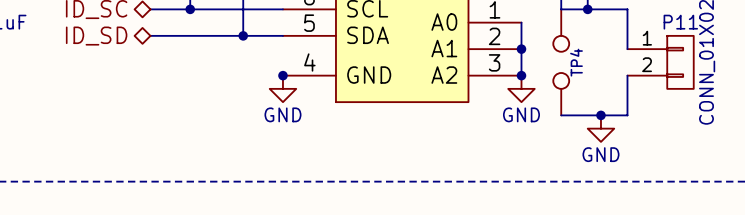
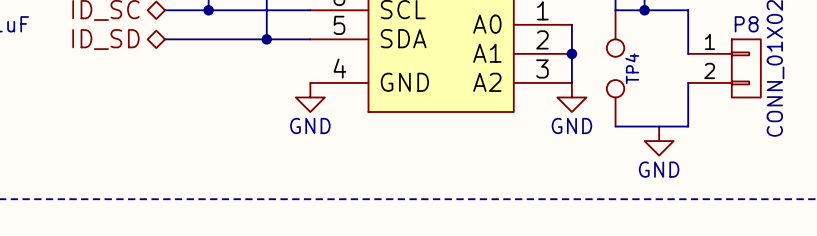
P11 name: P11 (680, 22) -> P8 (746, 24)
junction: (282, 75) -> none
junction: (521, 75) -> none
junction: (600, 115) -> none

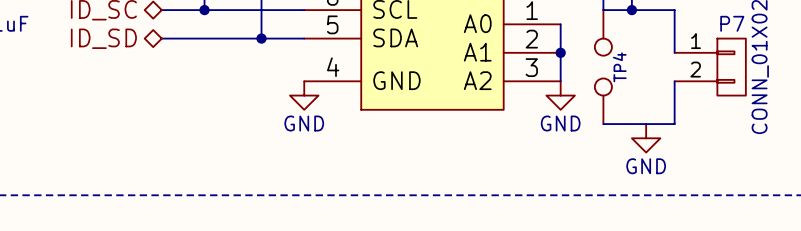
P8 name: P8 (746, 24) -> P7 (732, 23)

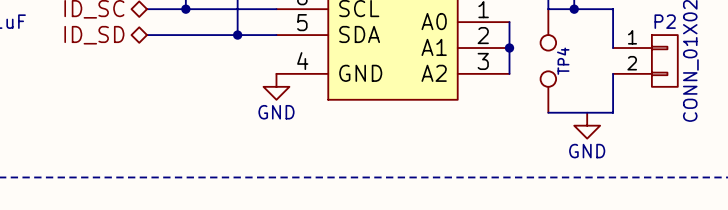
P7 name: P7 (732, 23) -> P2 (665, 21)
power symbol: GND (560, 95) -> none

